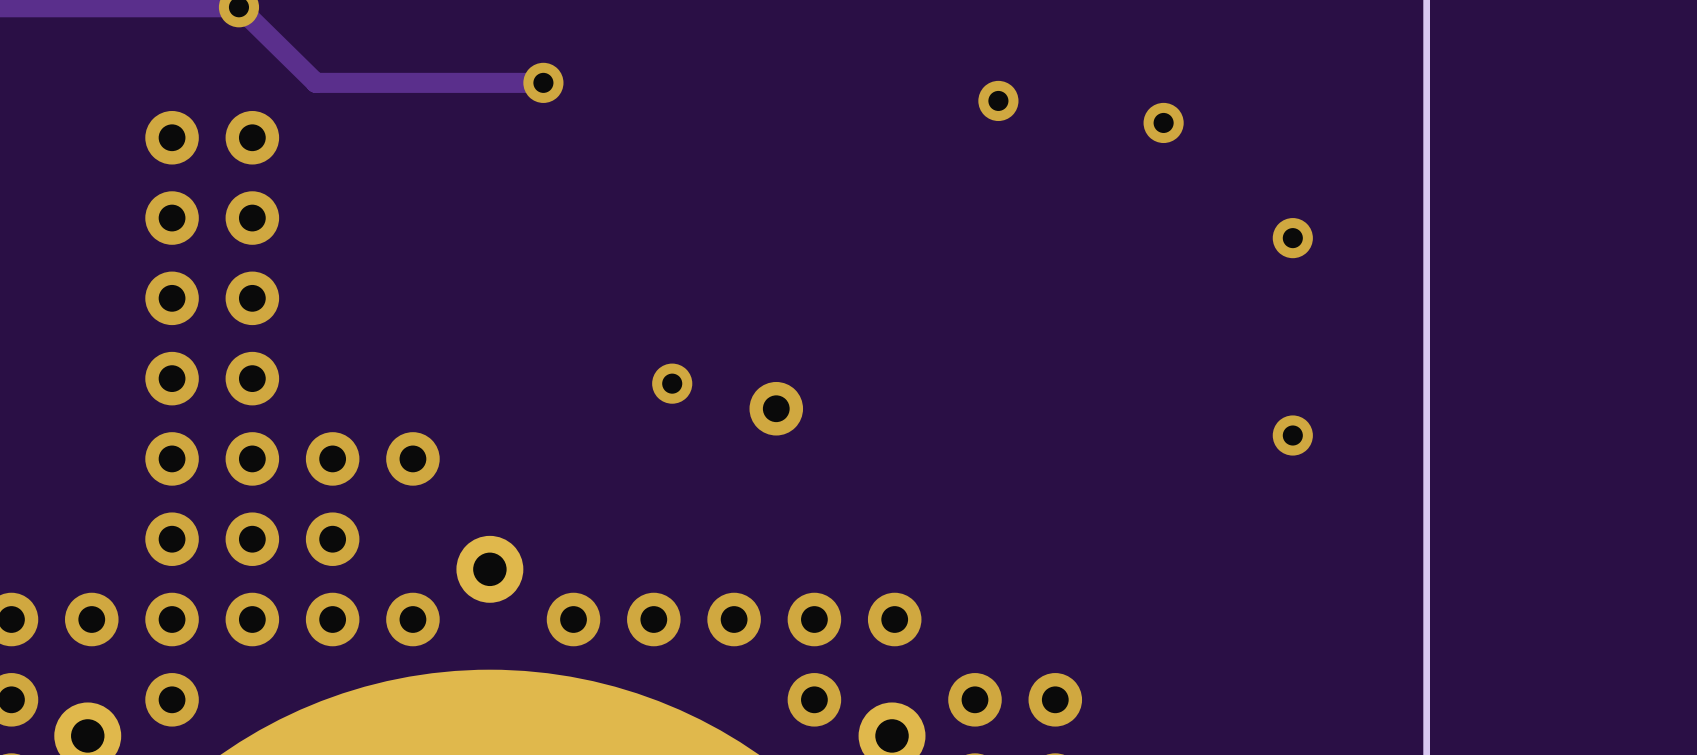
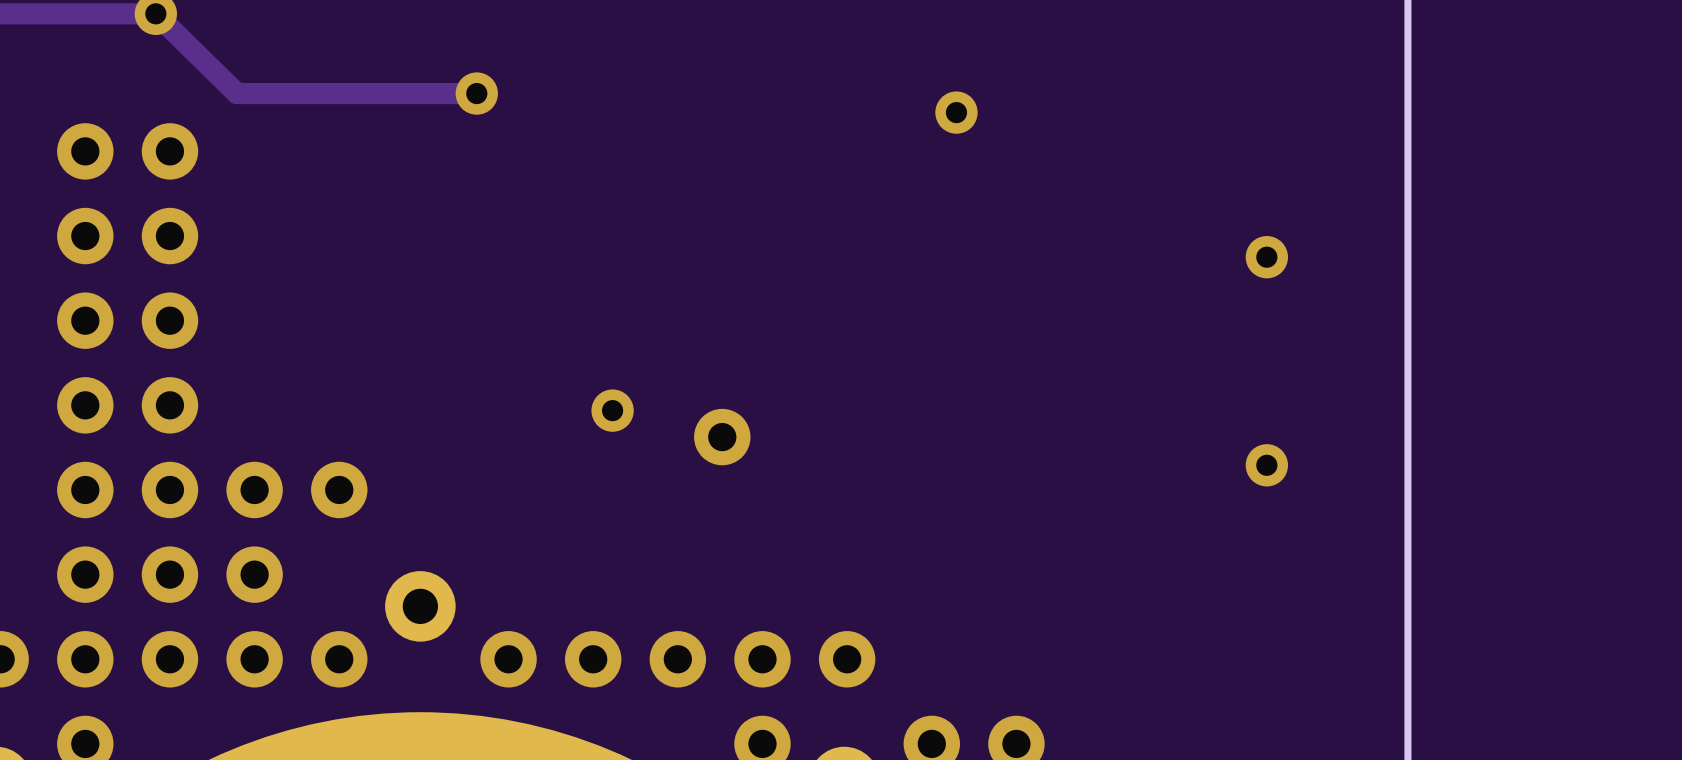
via: (1163, 122) -> none

